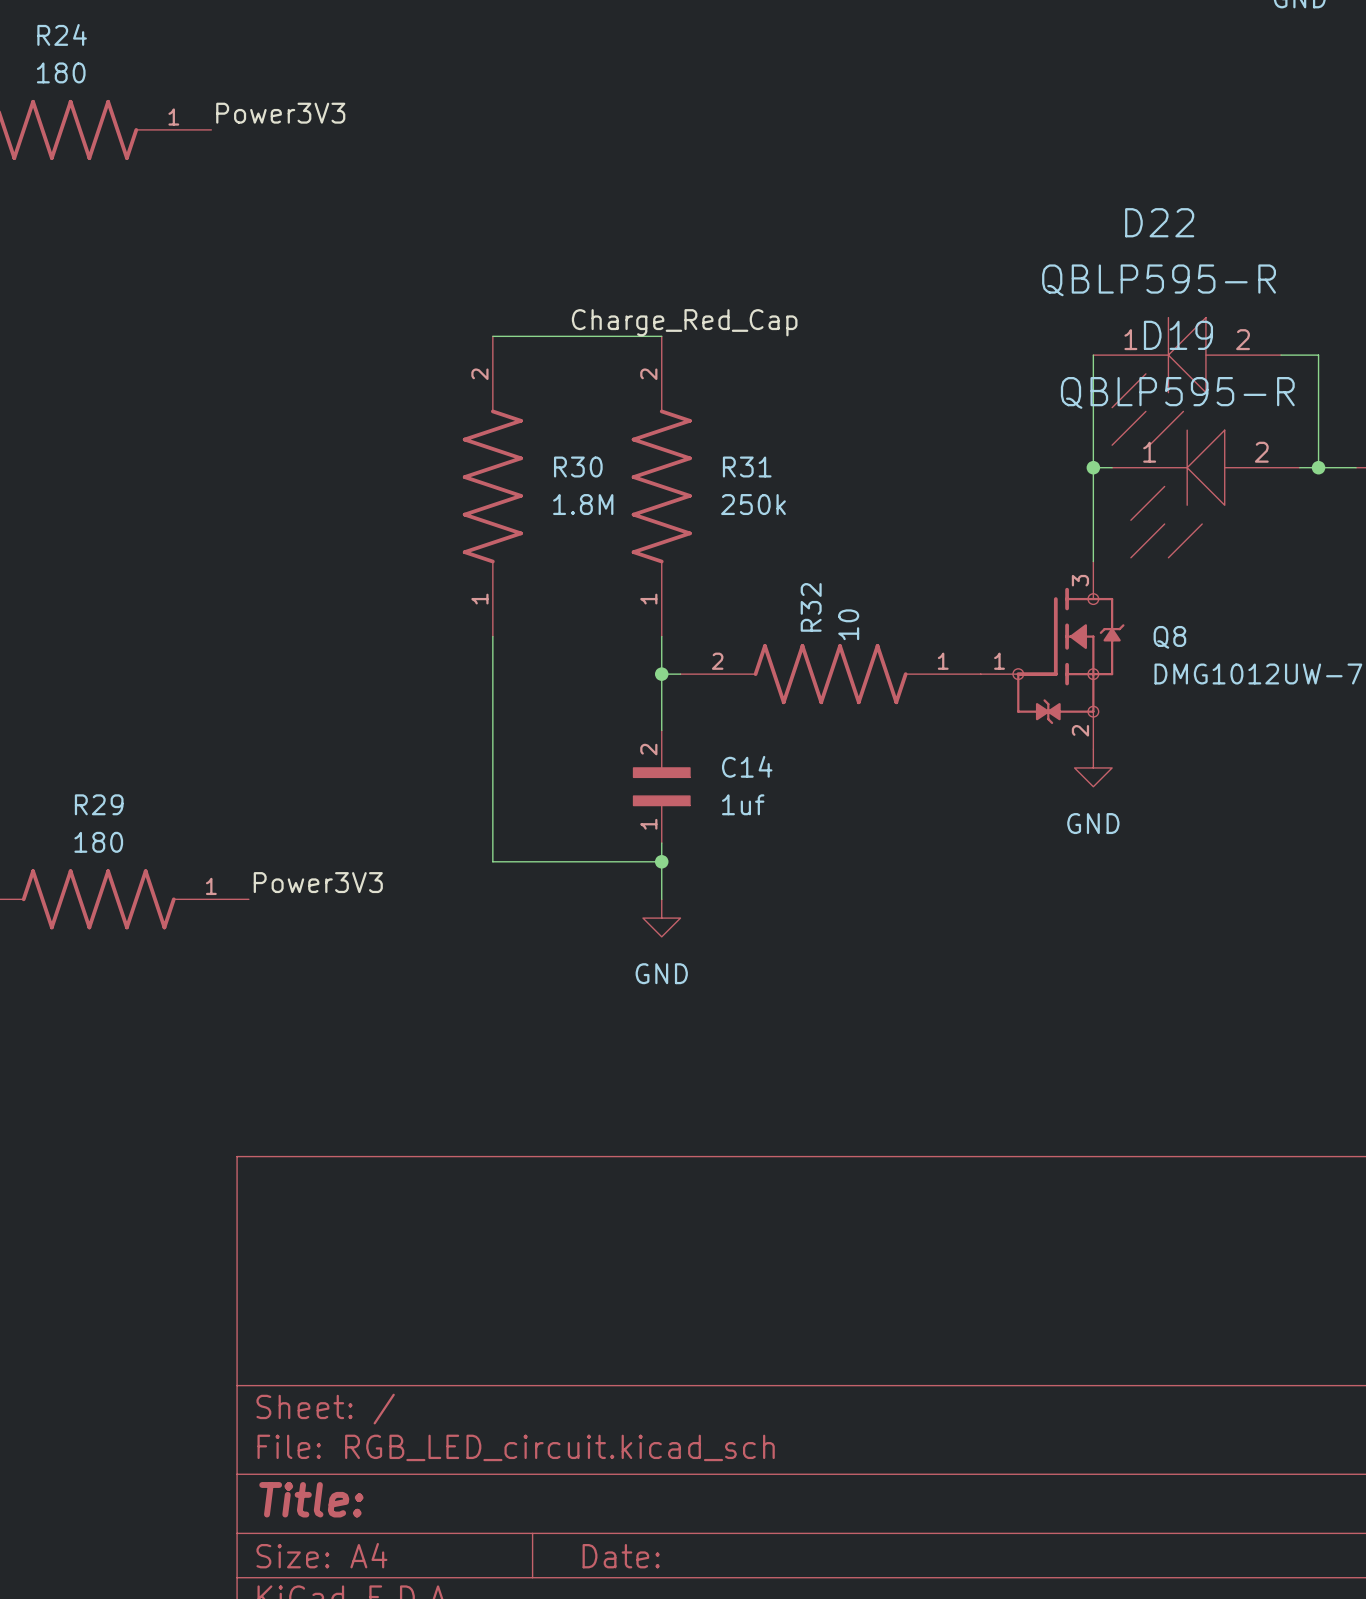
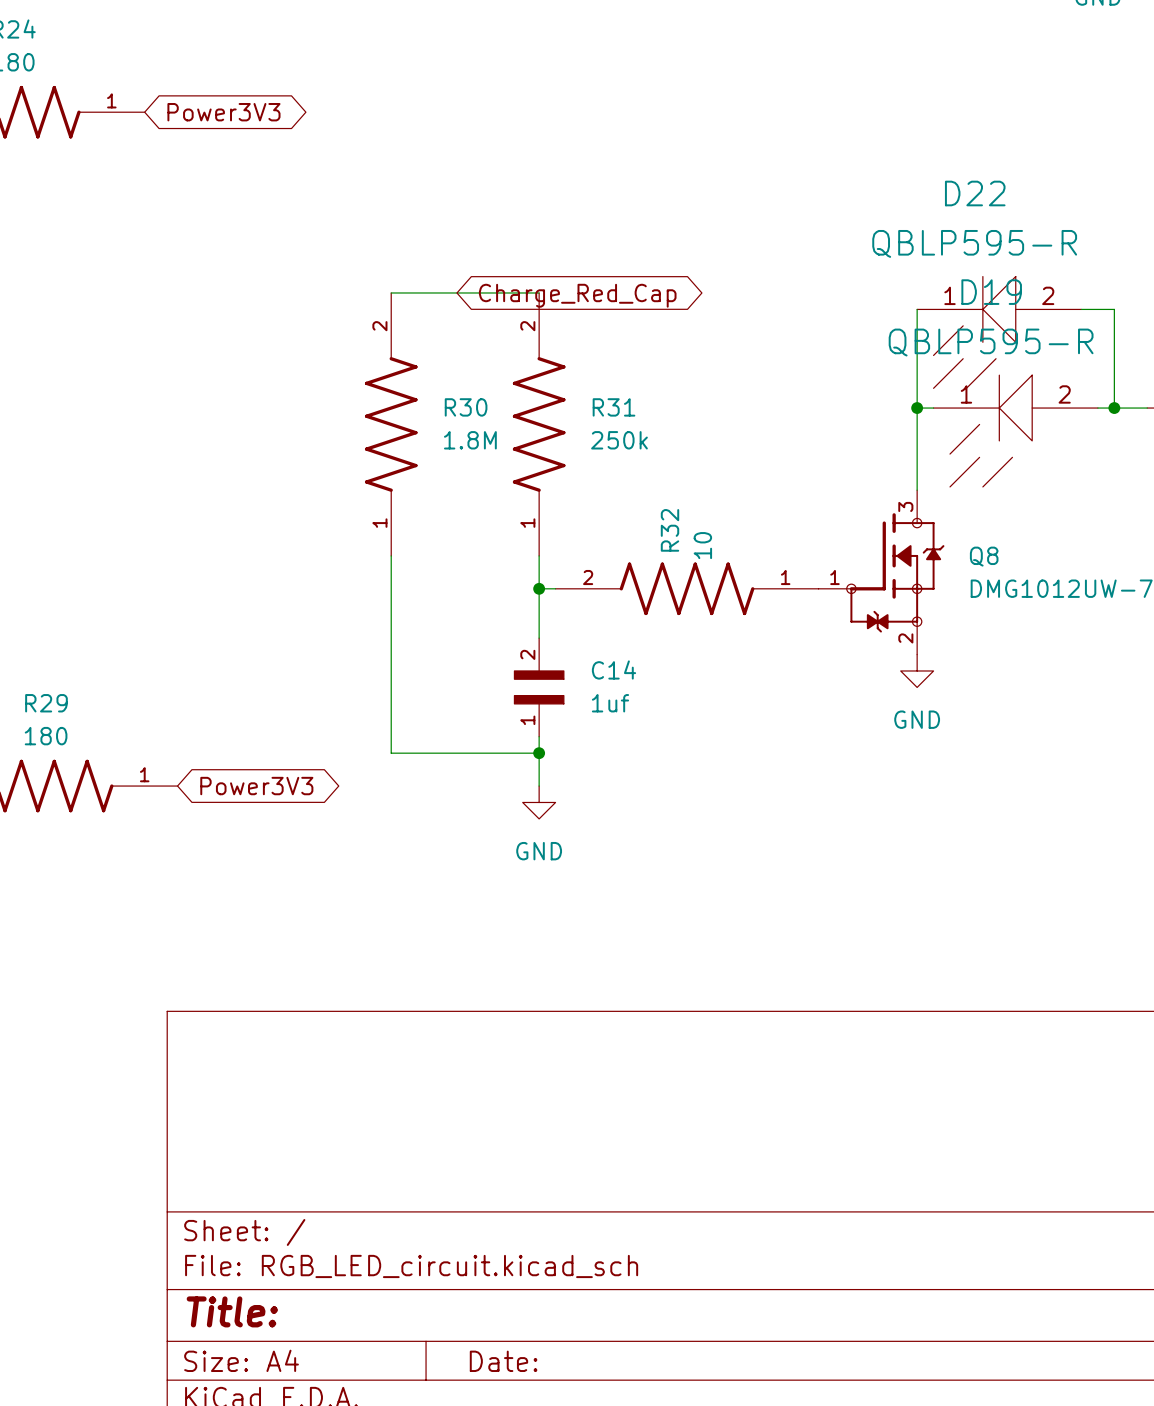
label: Power3V3 (280, 113) -> none
global label: none -> Power3V3 (223, 112)
label: Charge_Red_Cap (684, 322) -> none
global label: none -> Charge_Red_Cap (577, 295)
label: Power3V3 (318, 882) -> none
global label: none -> Power3V3 (256, 786)

